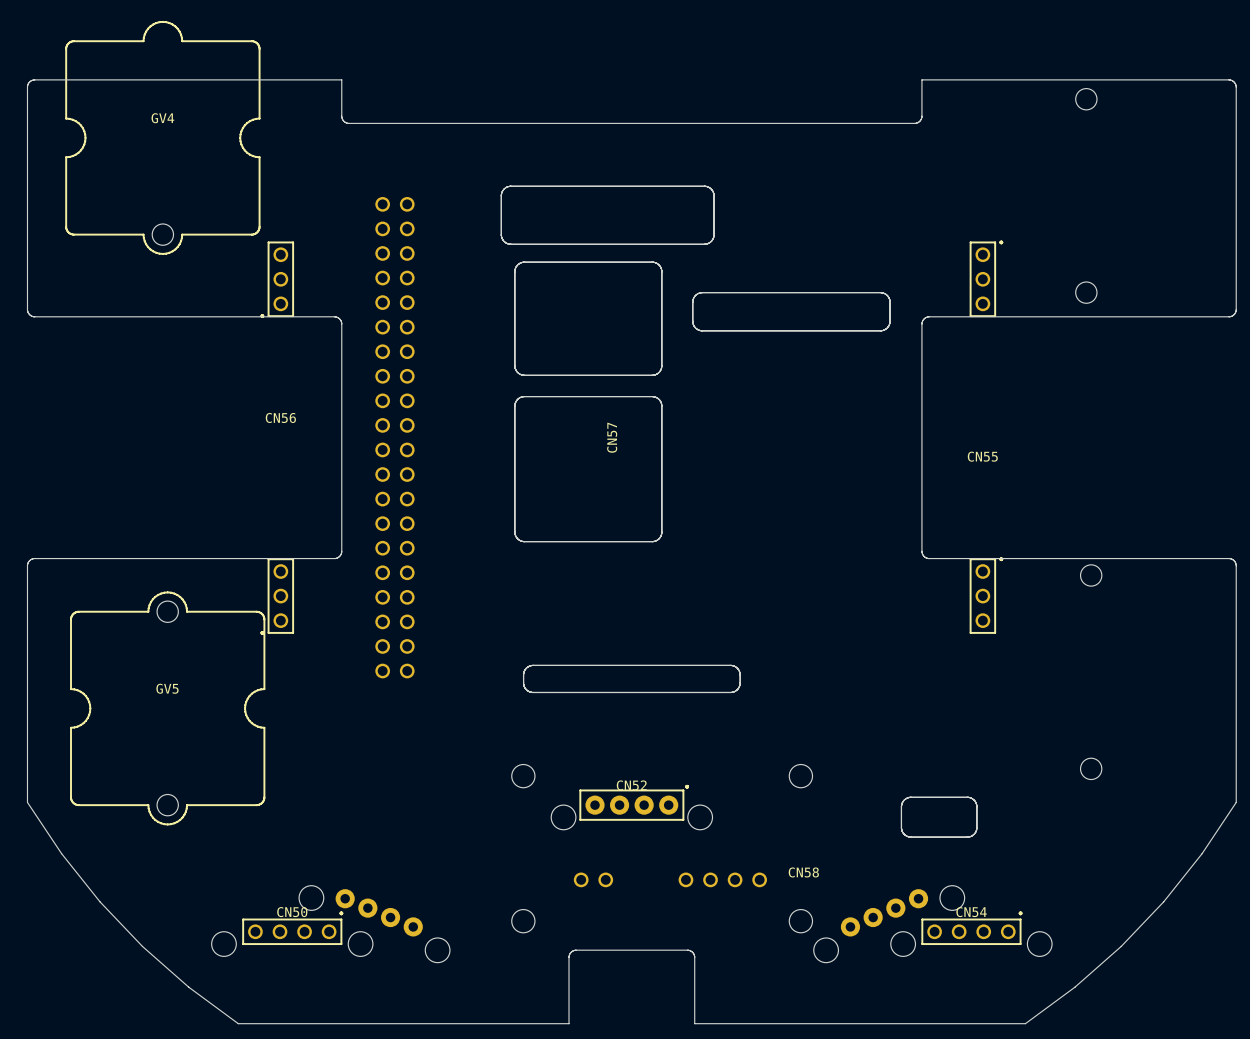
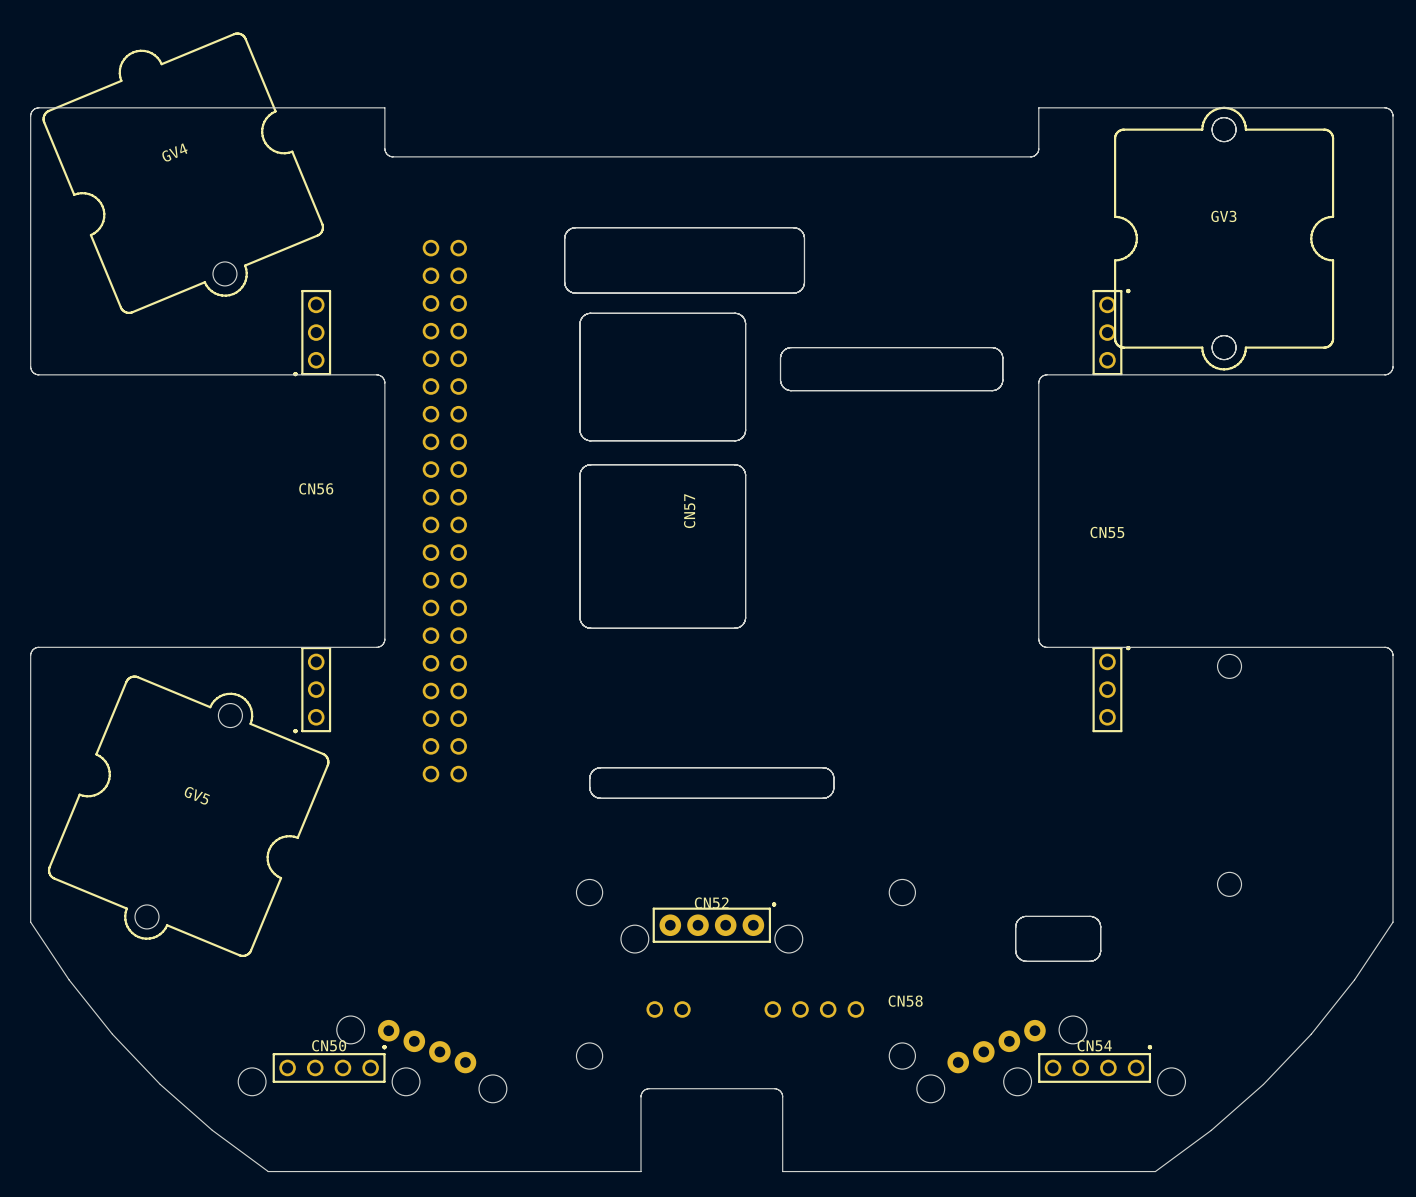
GV4 rotation: 0° (162, 137) -> 22.5° counterclockwise (183, 173)
GV3: none -> (1224, 238)
GV5 rotation: 0° (167, 708) -> 22.5° clockwise (188, 816)

